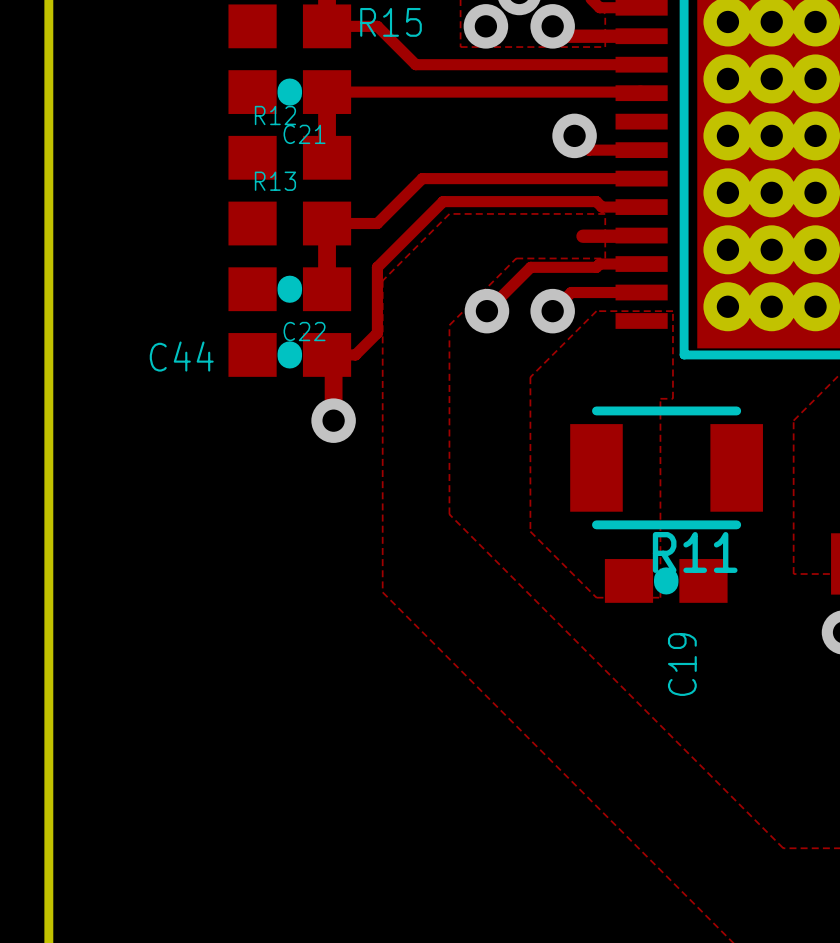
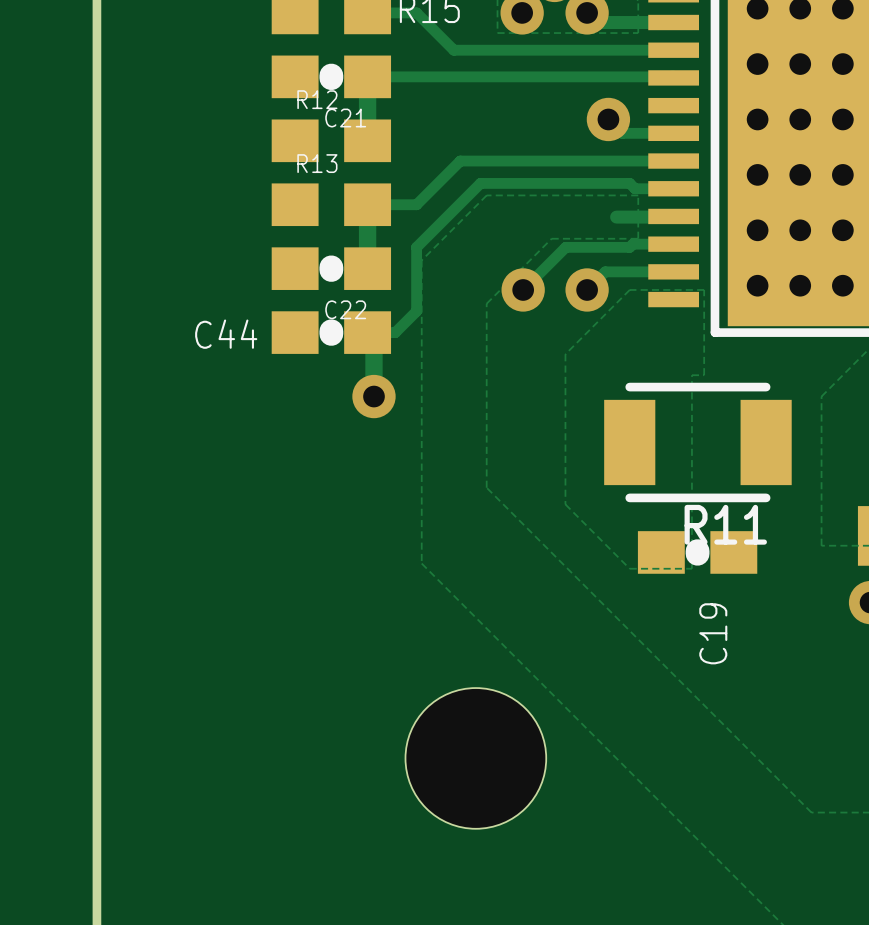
part: none -> (475, 758)

